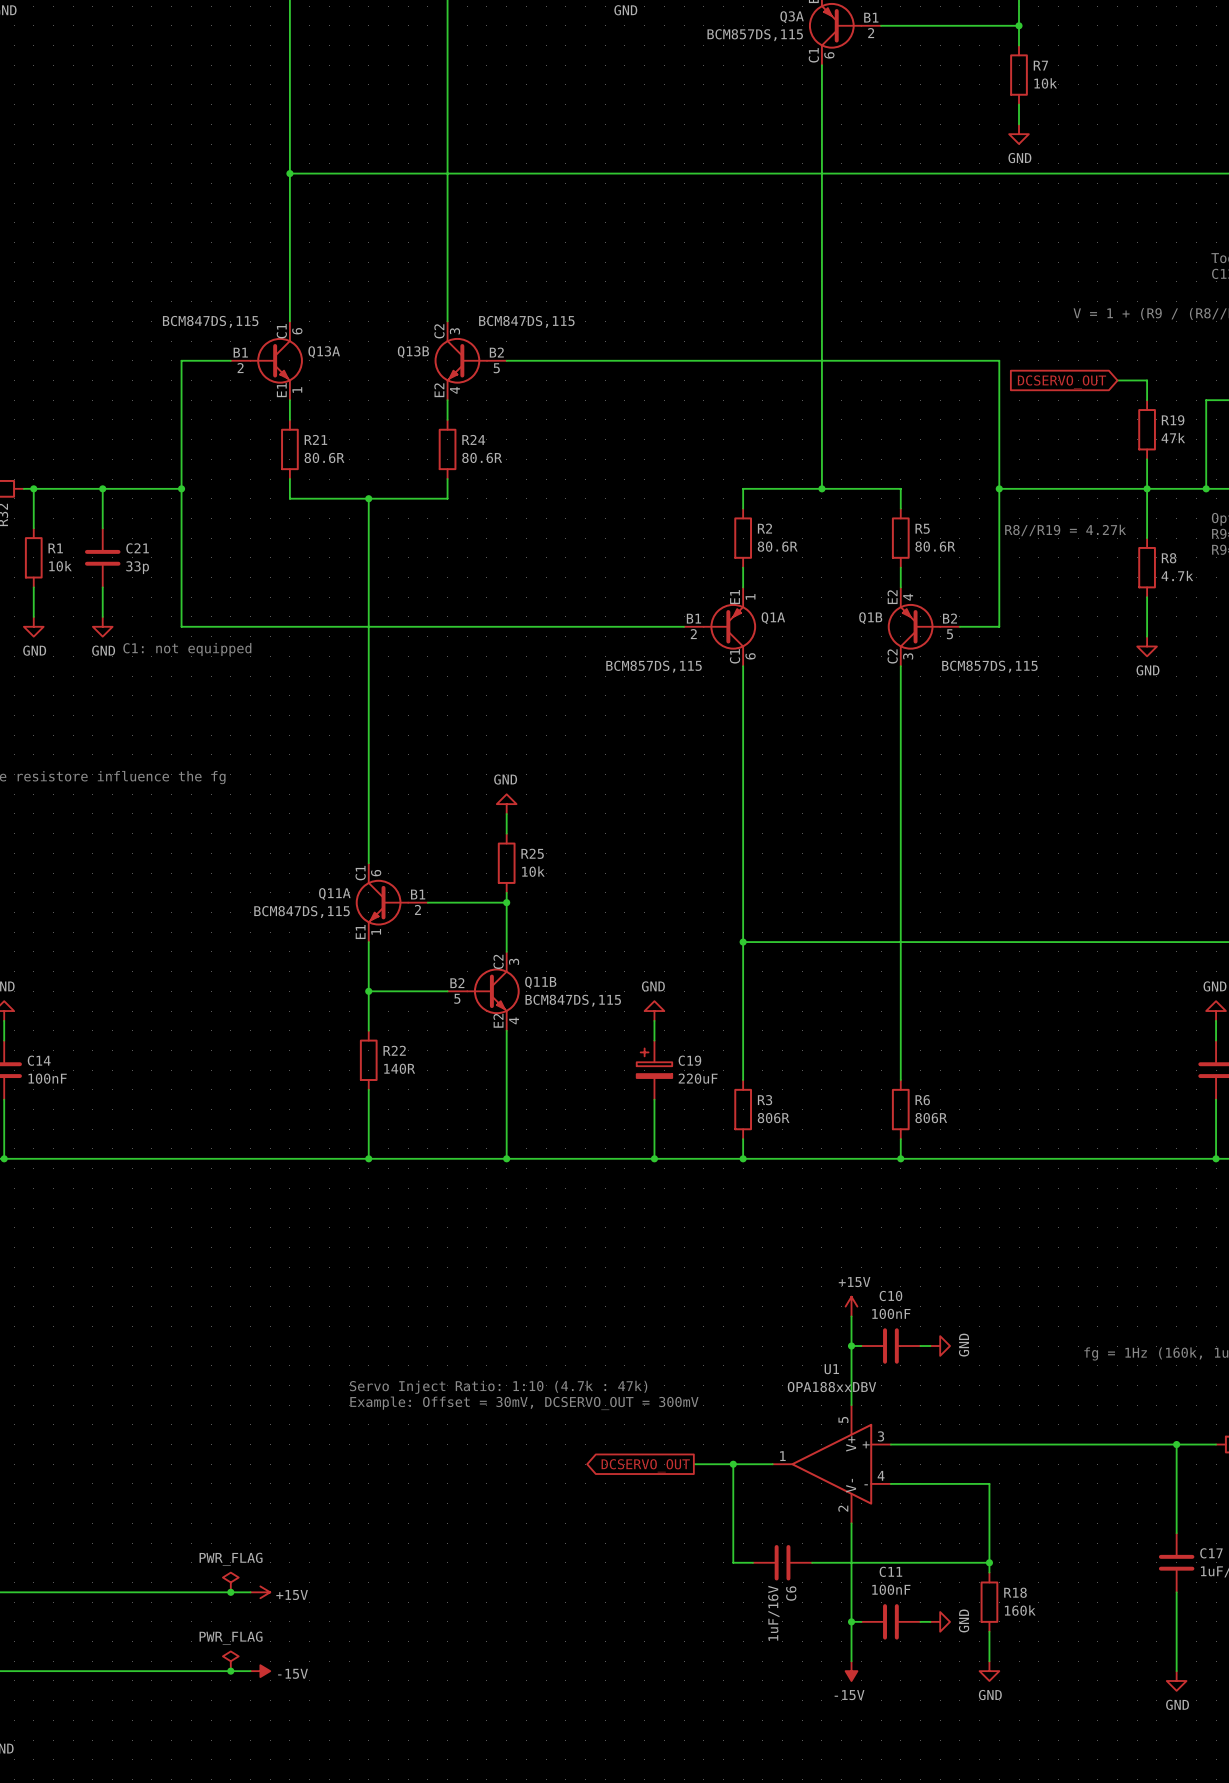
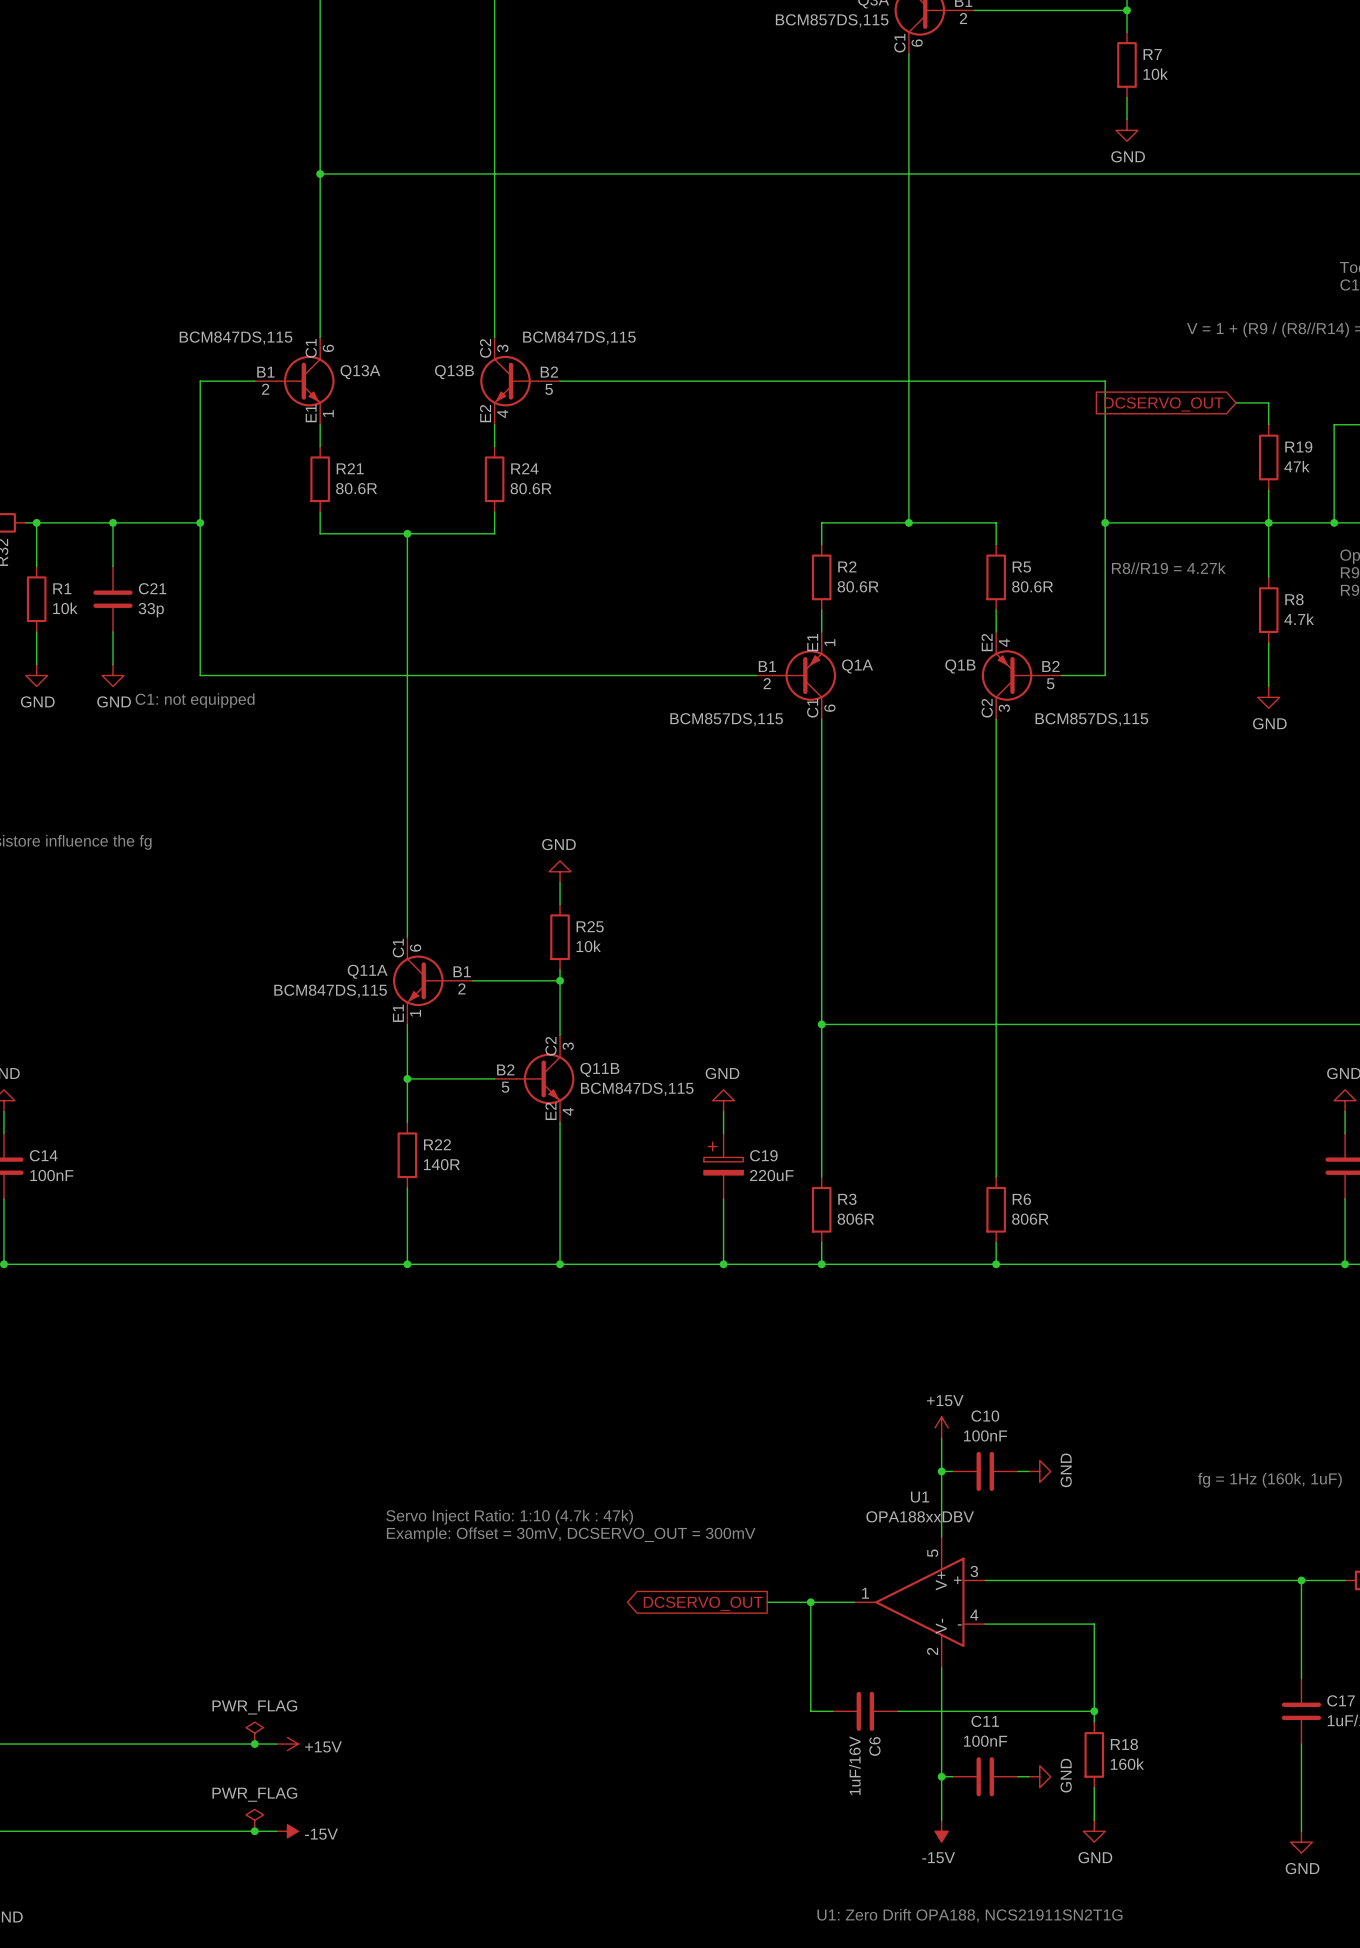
text: none -> U1: Zero Drift OPA188, NCS21911SN2T1G (969, 1915)

